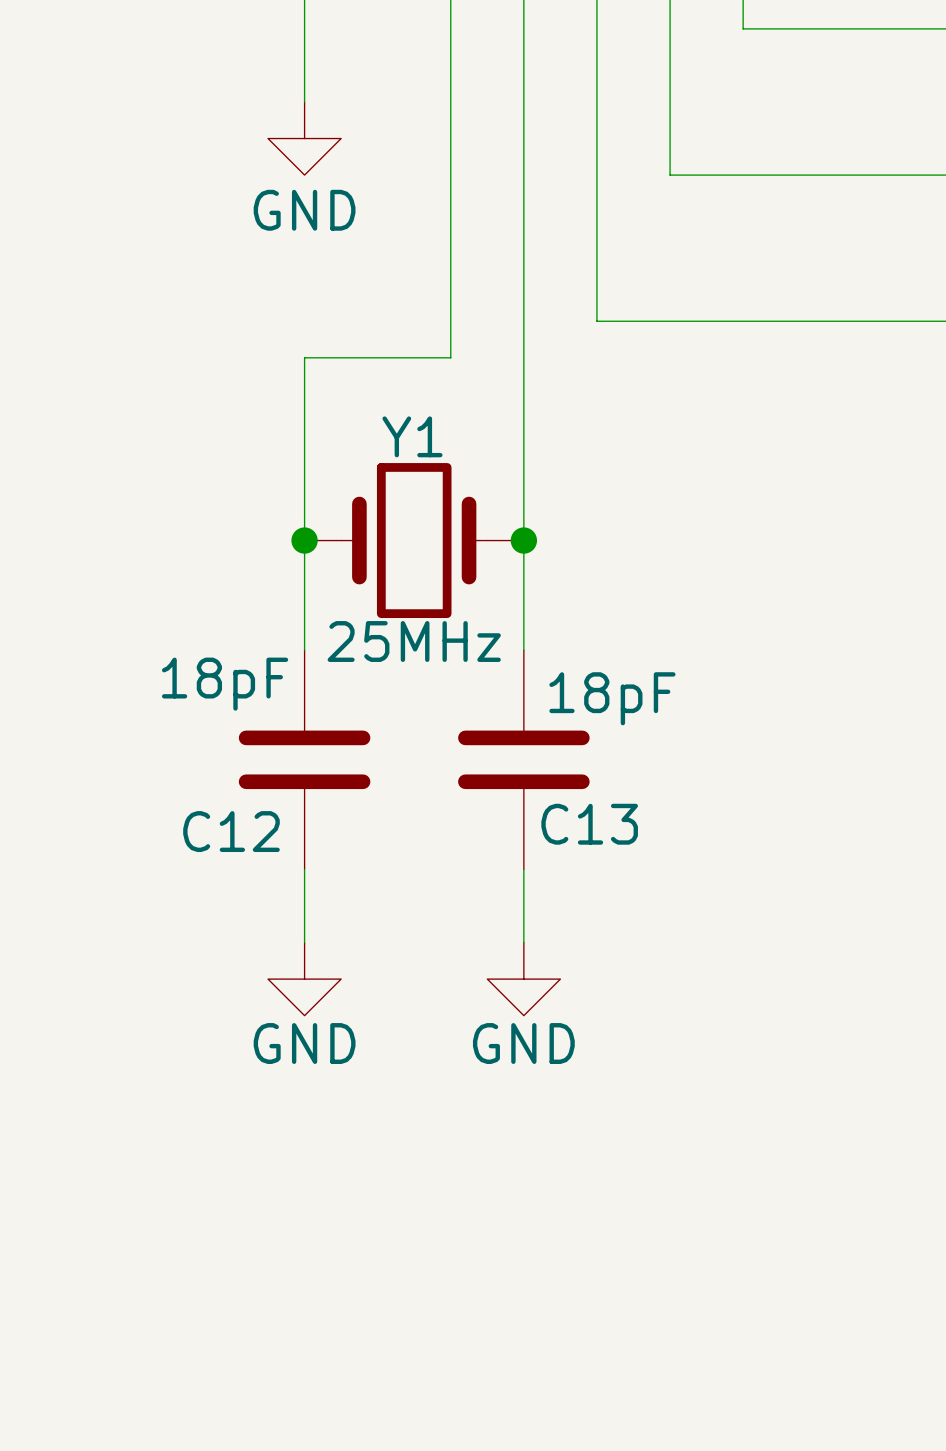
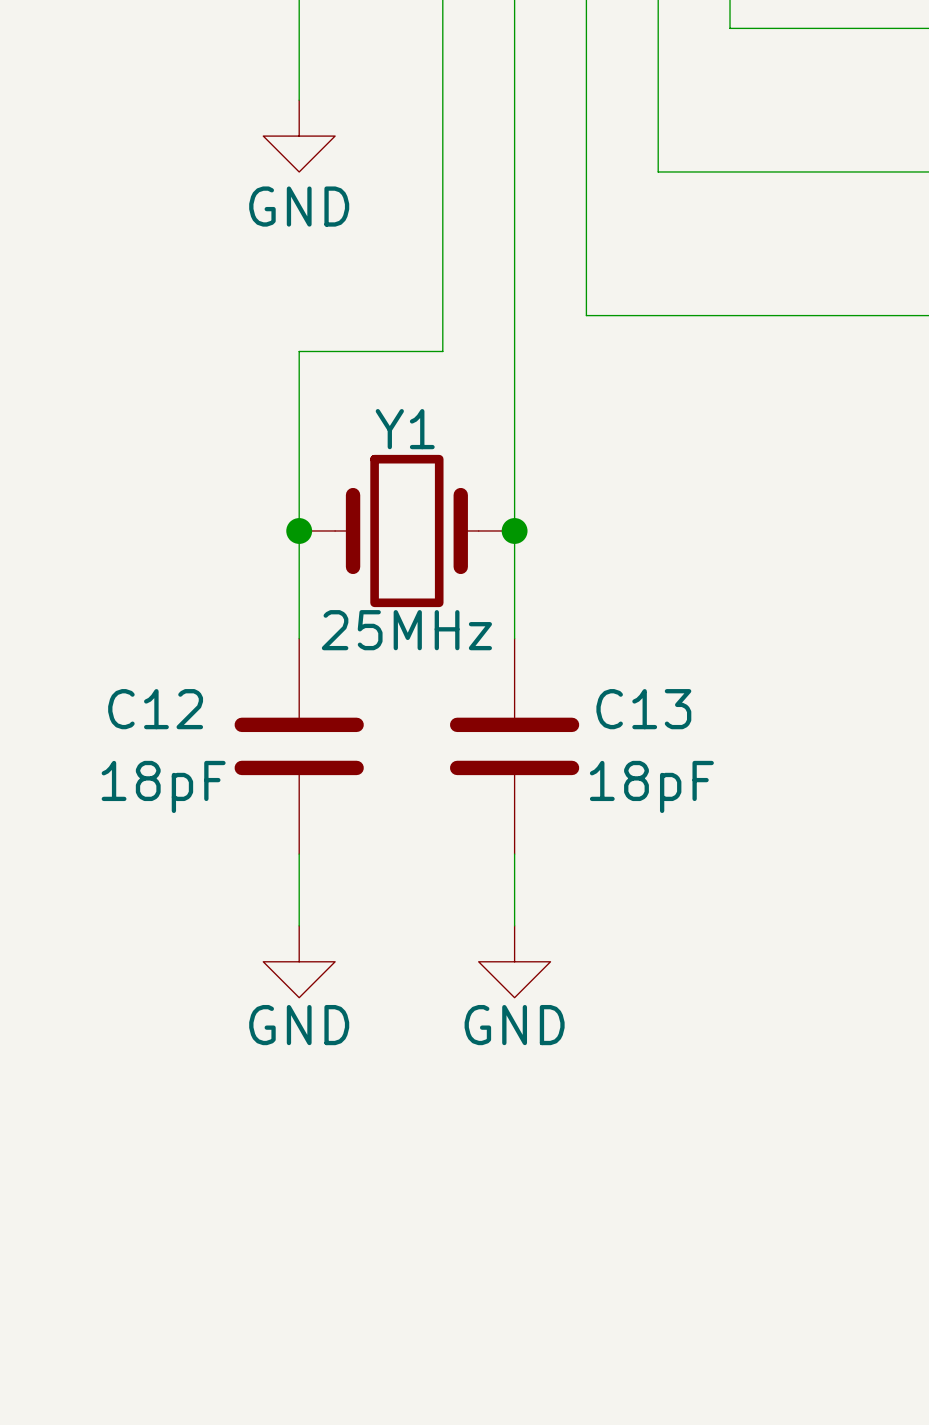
C12 value position: 18pF (225, 684) -> 18pF (163, 786)
C13 value position: 18pF (612, 698) -> 18pF (651, 786)
C13 name position: C13 (589, 824) -> C13 (643, 709)
C12 name position: C12 (231, 831) -> C12 (155, 709)

